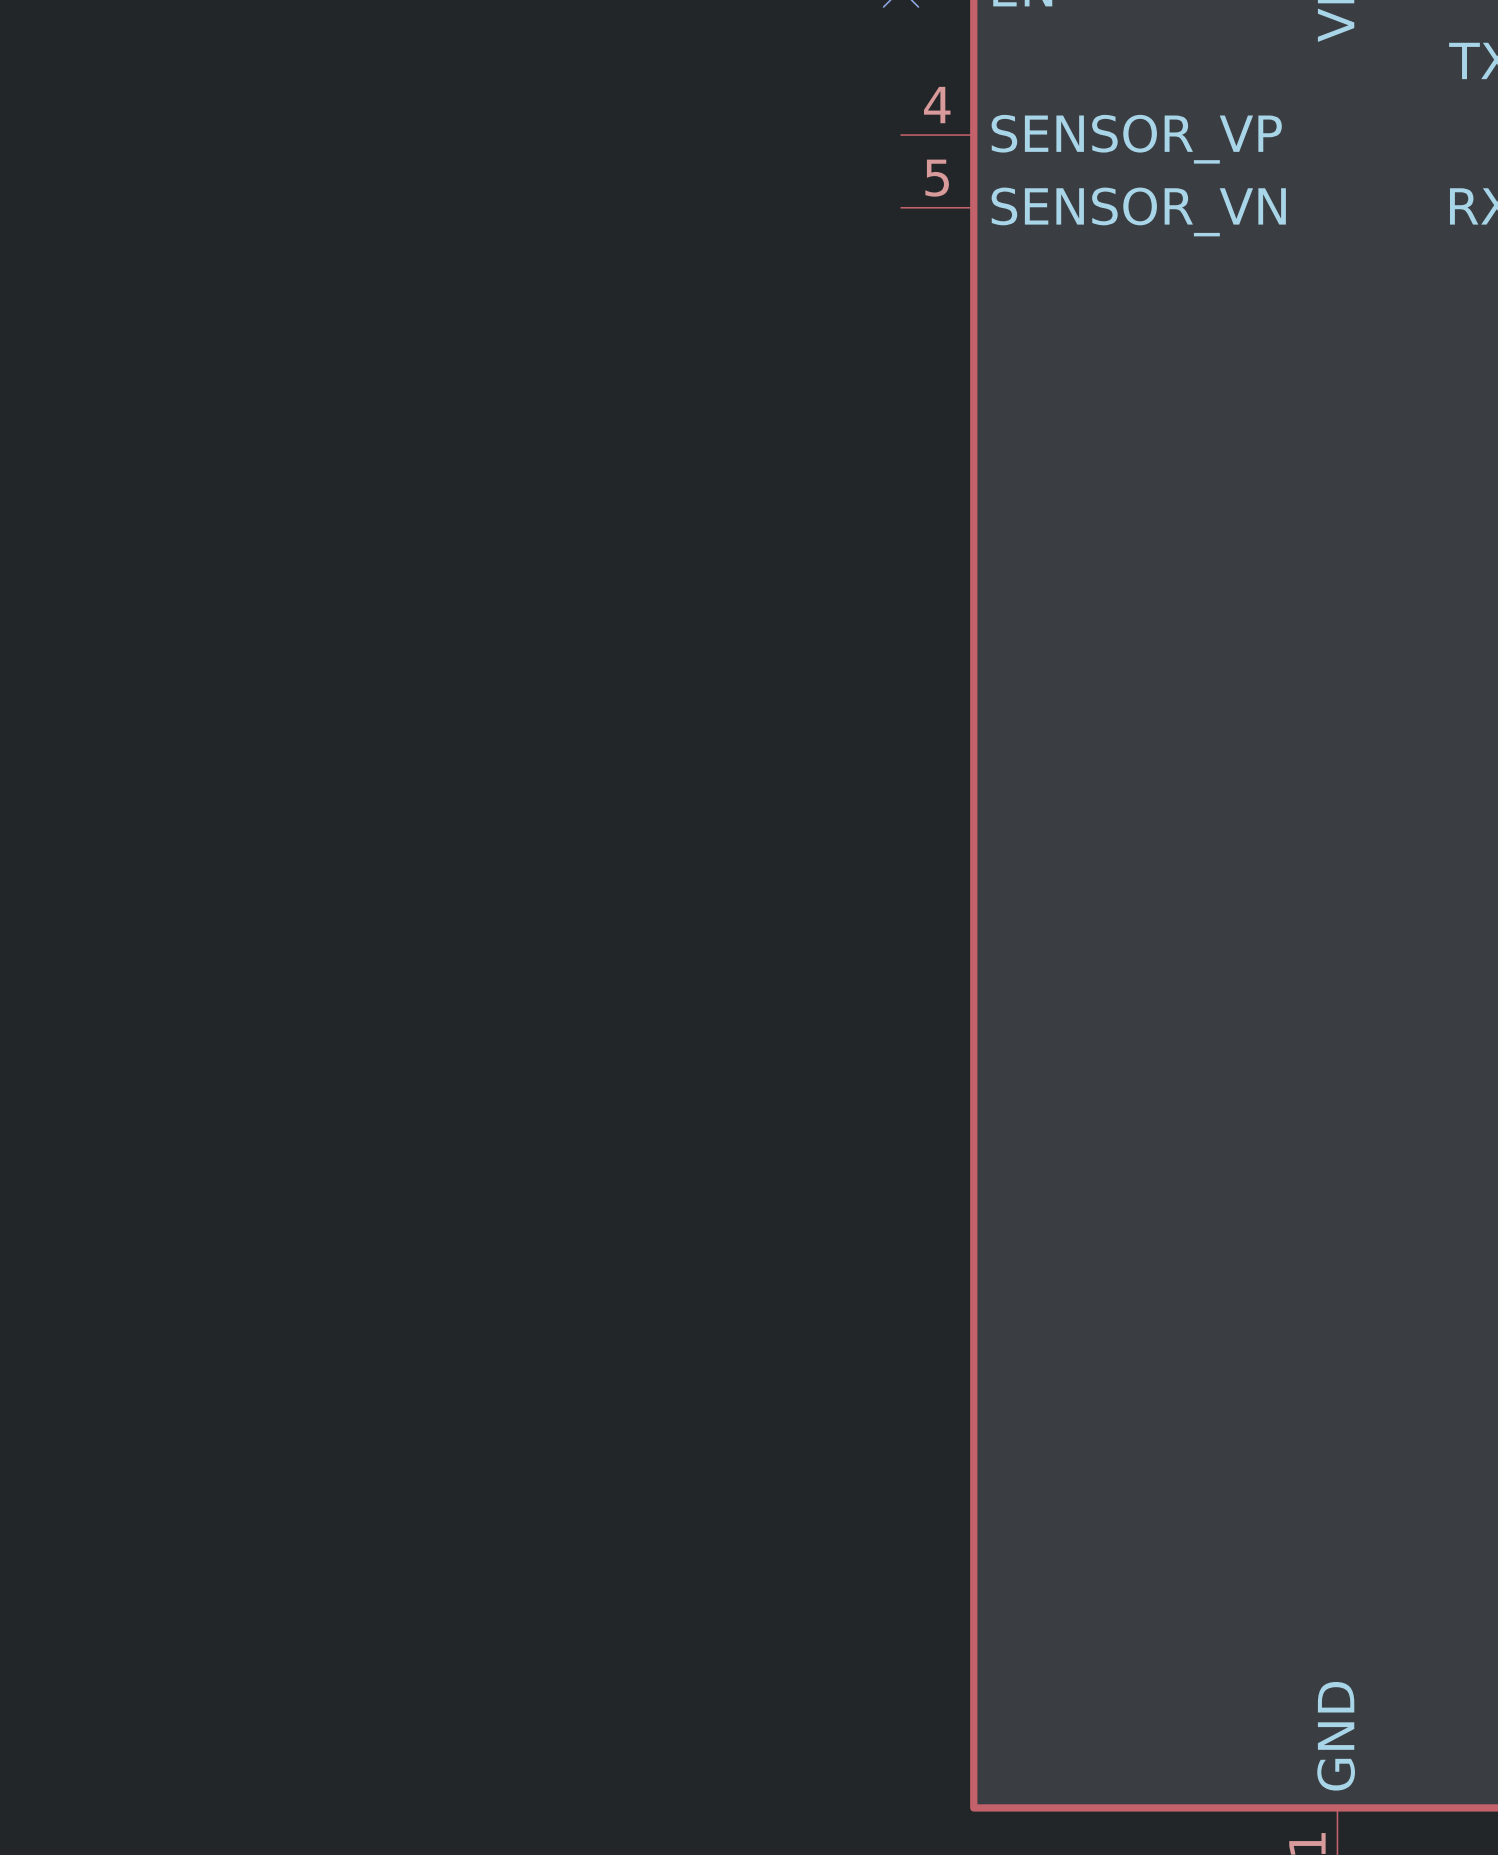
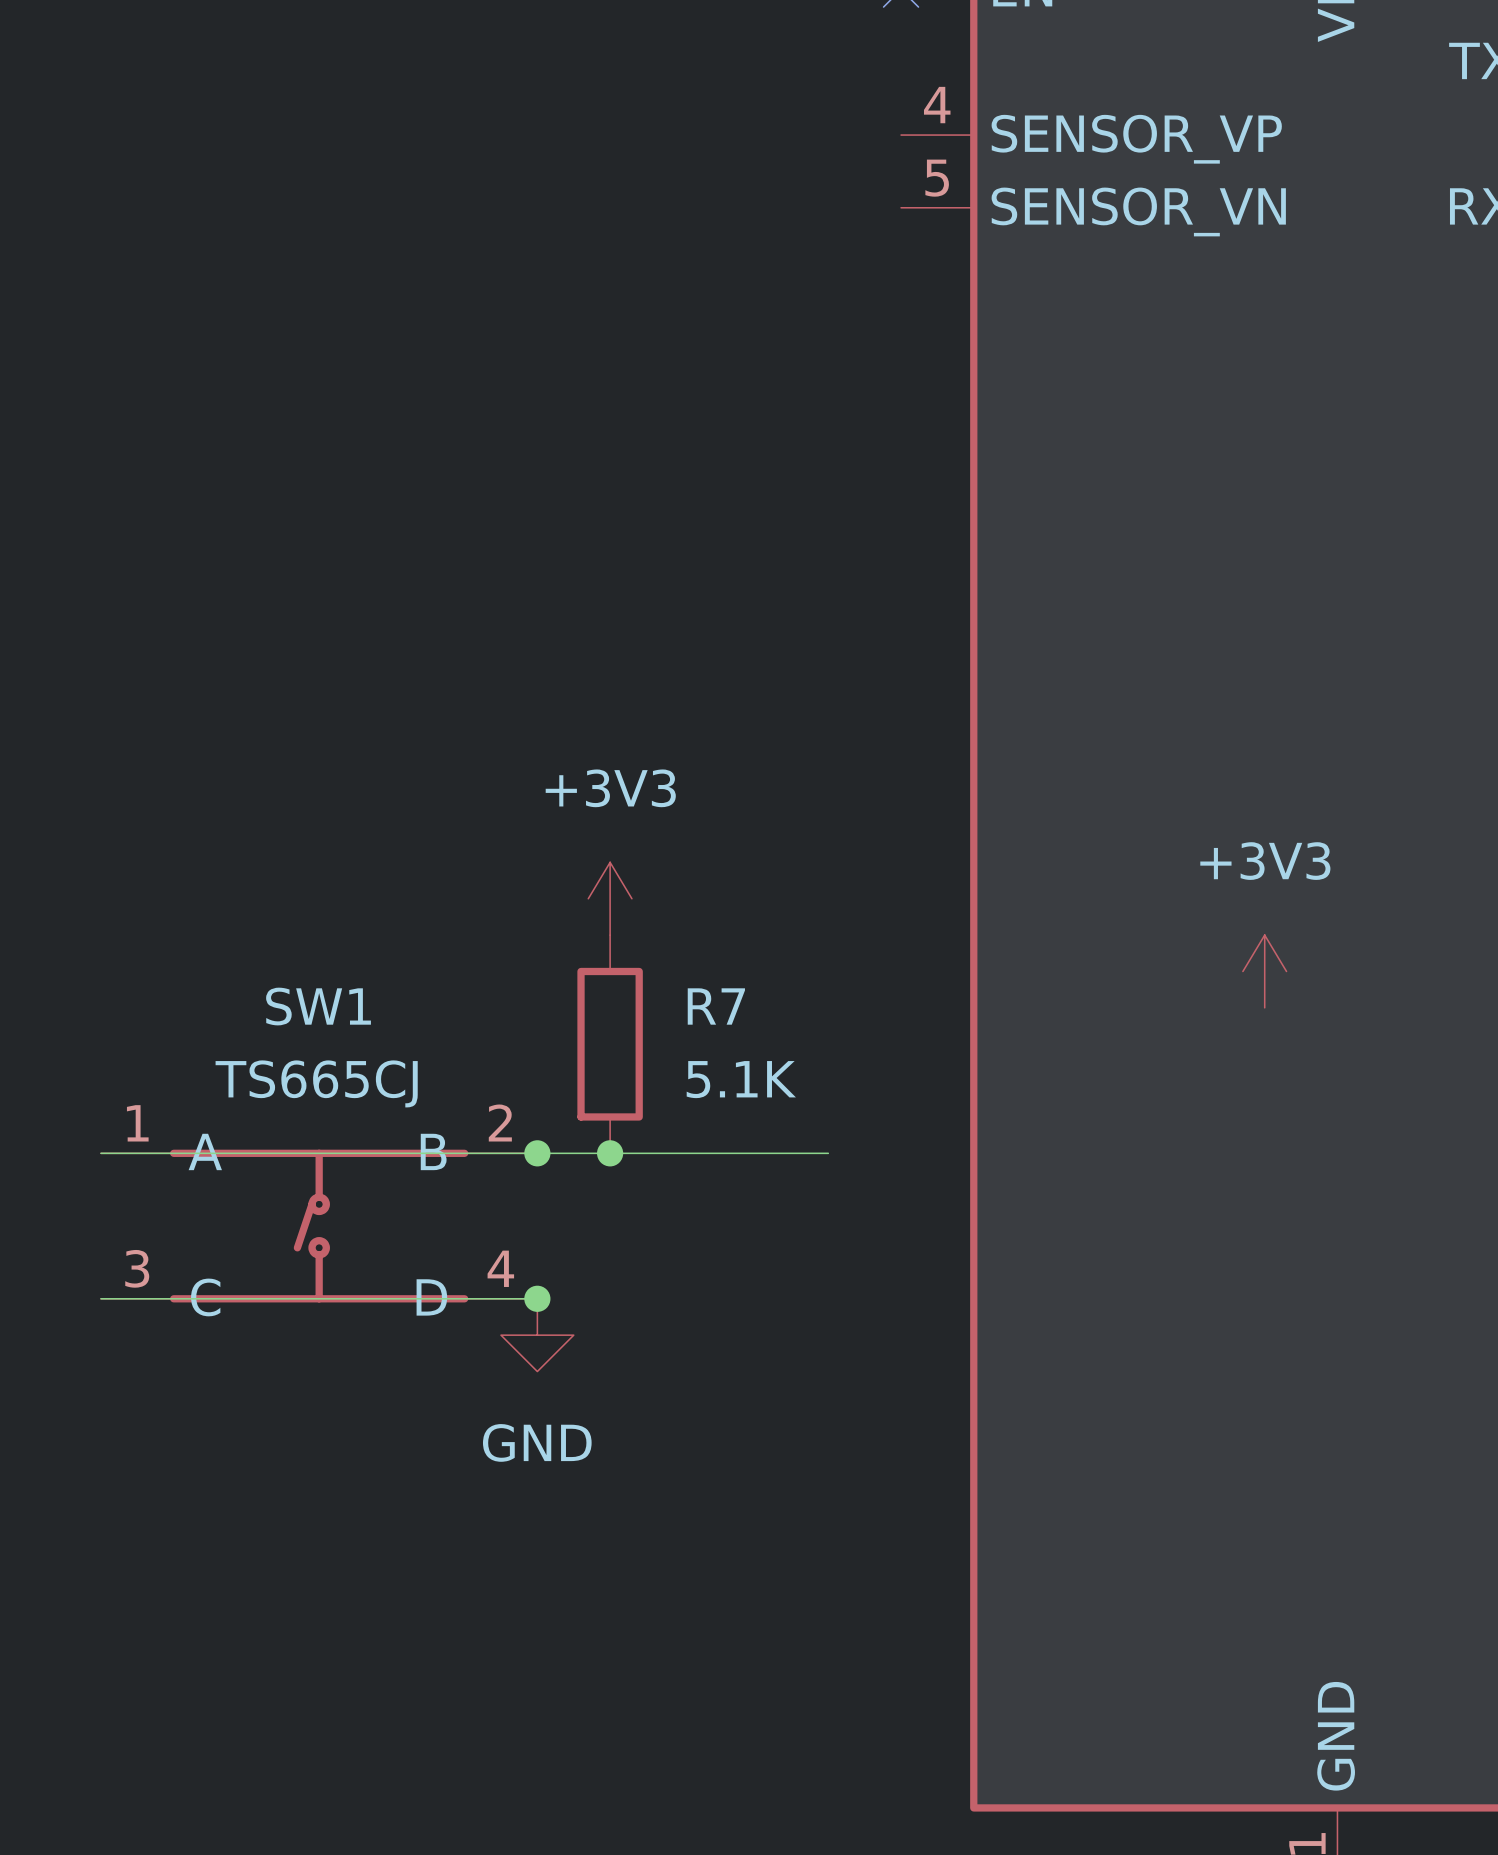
power symbol: none -> +3V3 (610, 898)
power symbol: none -> +3V3 (1264, 971)
R7: none -> 5.1K (610, 1044)
wire: none -> (100, 1153) (828, 1153)
junction: none -> (537, 1153)
junction: none -> (610, 1153)
SW1: none -> TS665CJ (319, 1226)
wire: none -> (100, 1298) (537, 1298)
junction: none -> (537, 1298)
power symbol: none -> GND (537, 1335)

